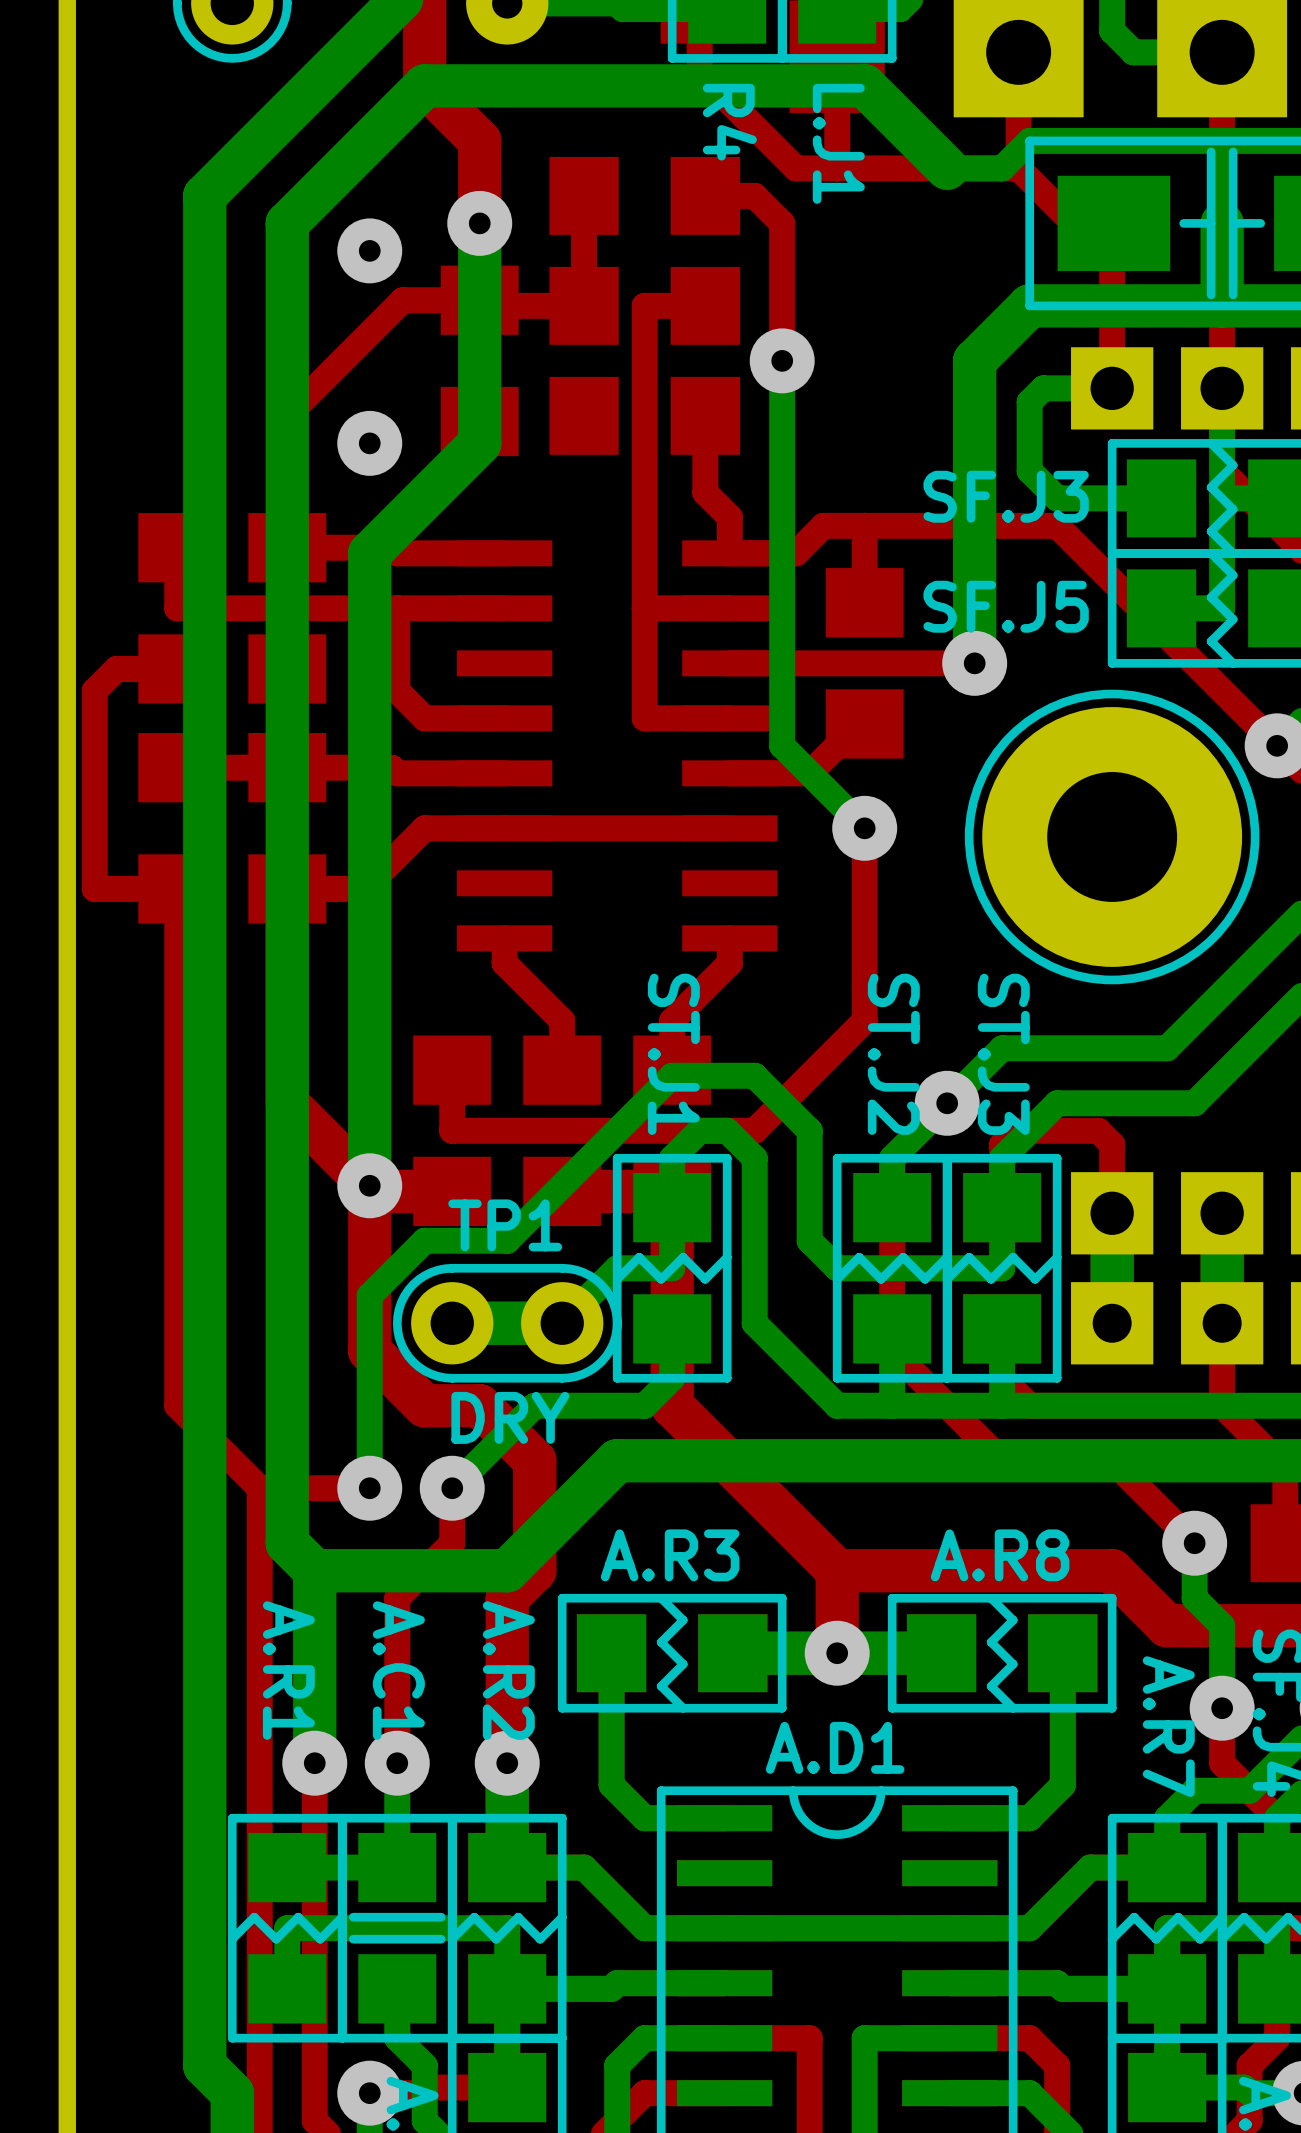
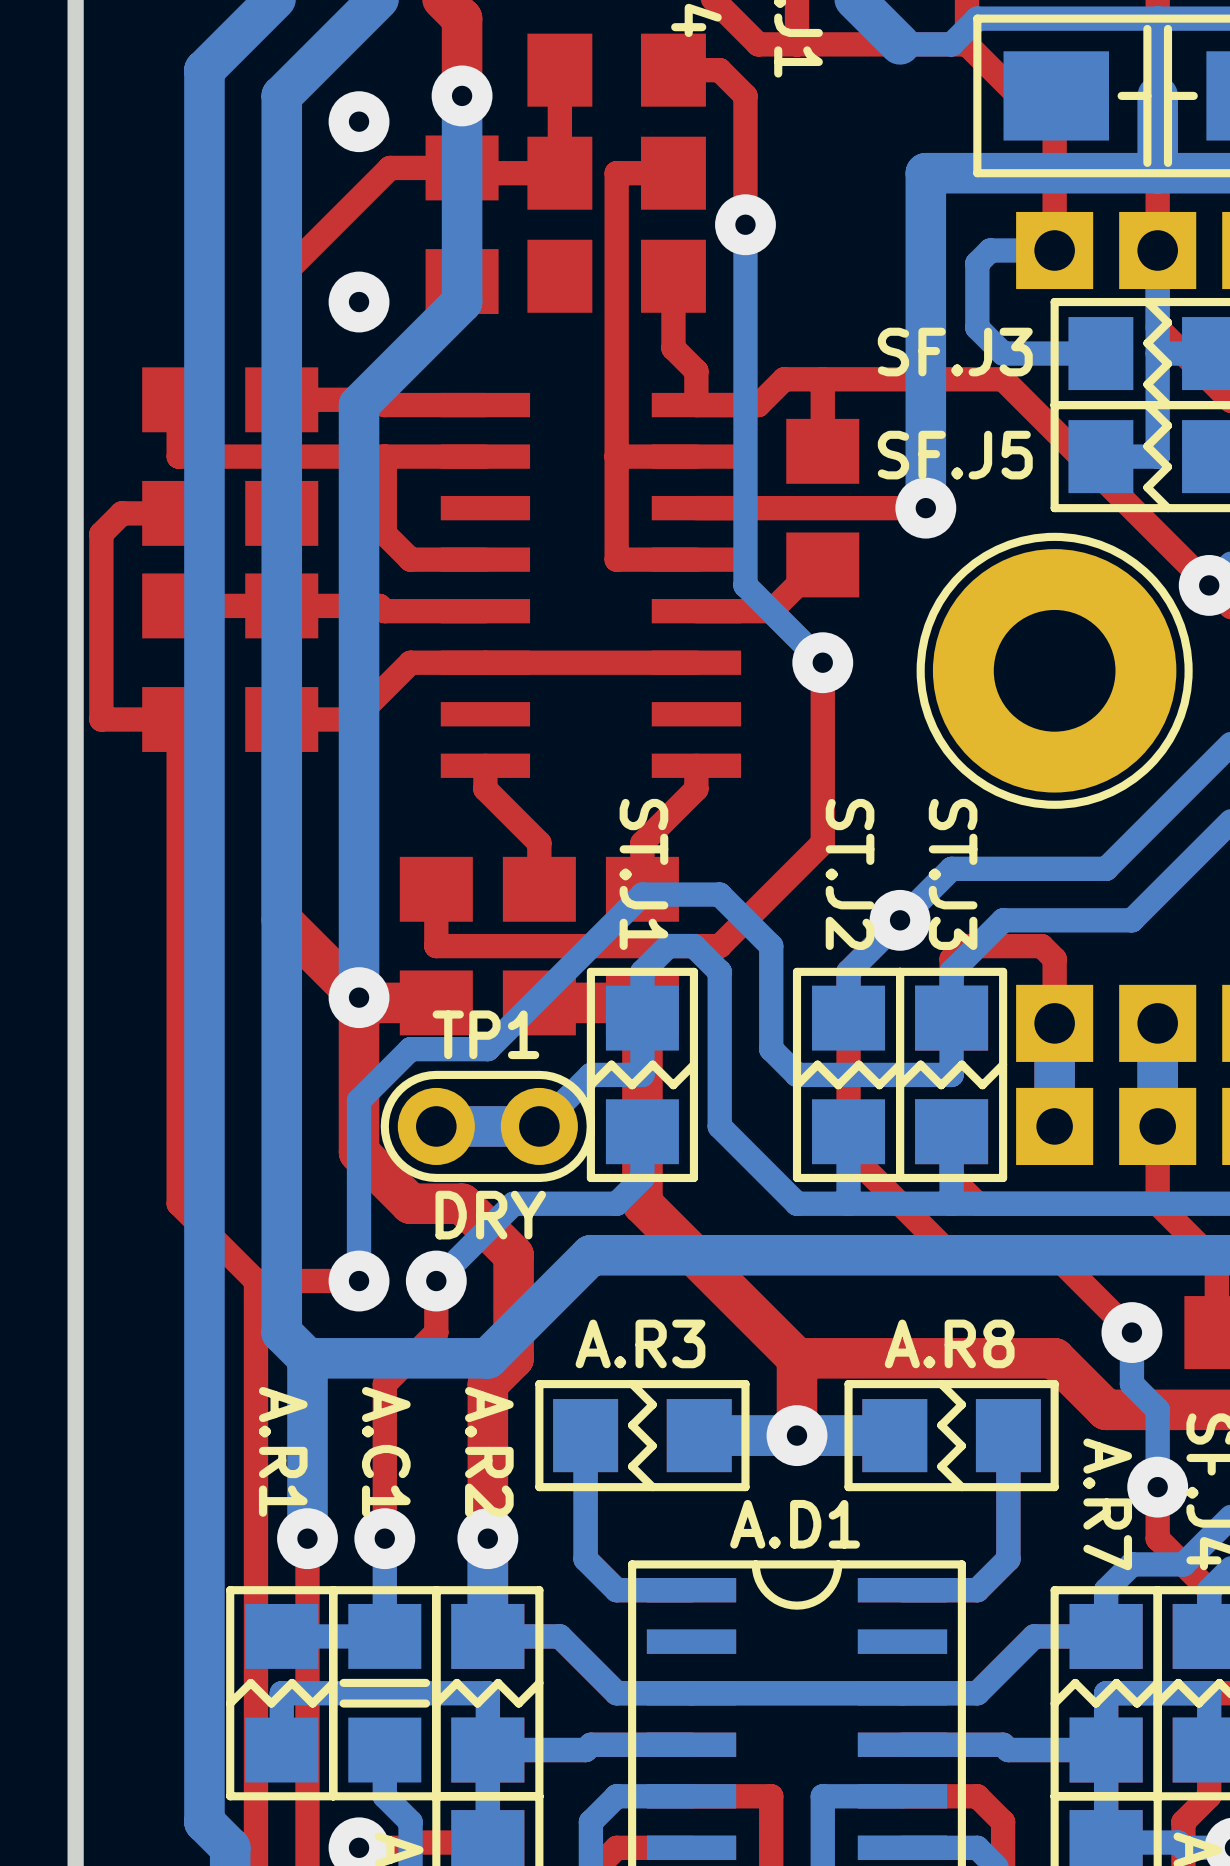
bottom track: (1029, 305) (974, 360) -> (977, 173) (925, 173) (925, 224)

